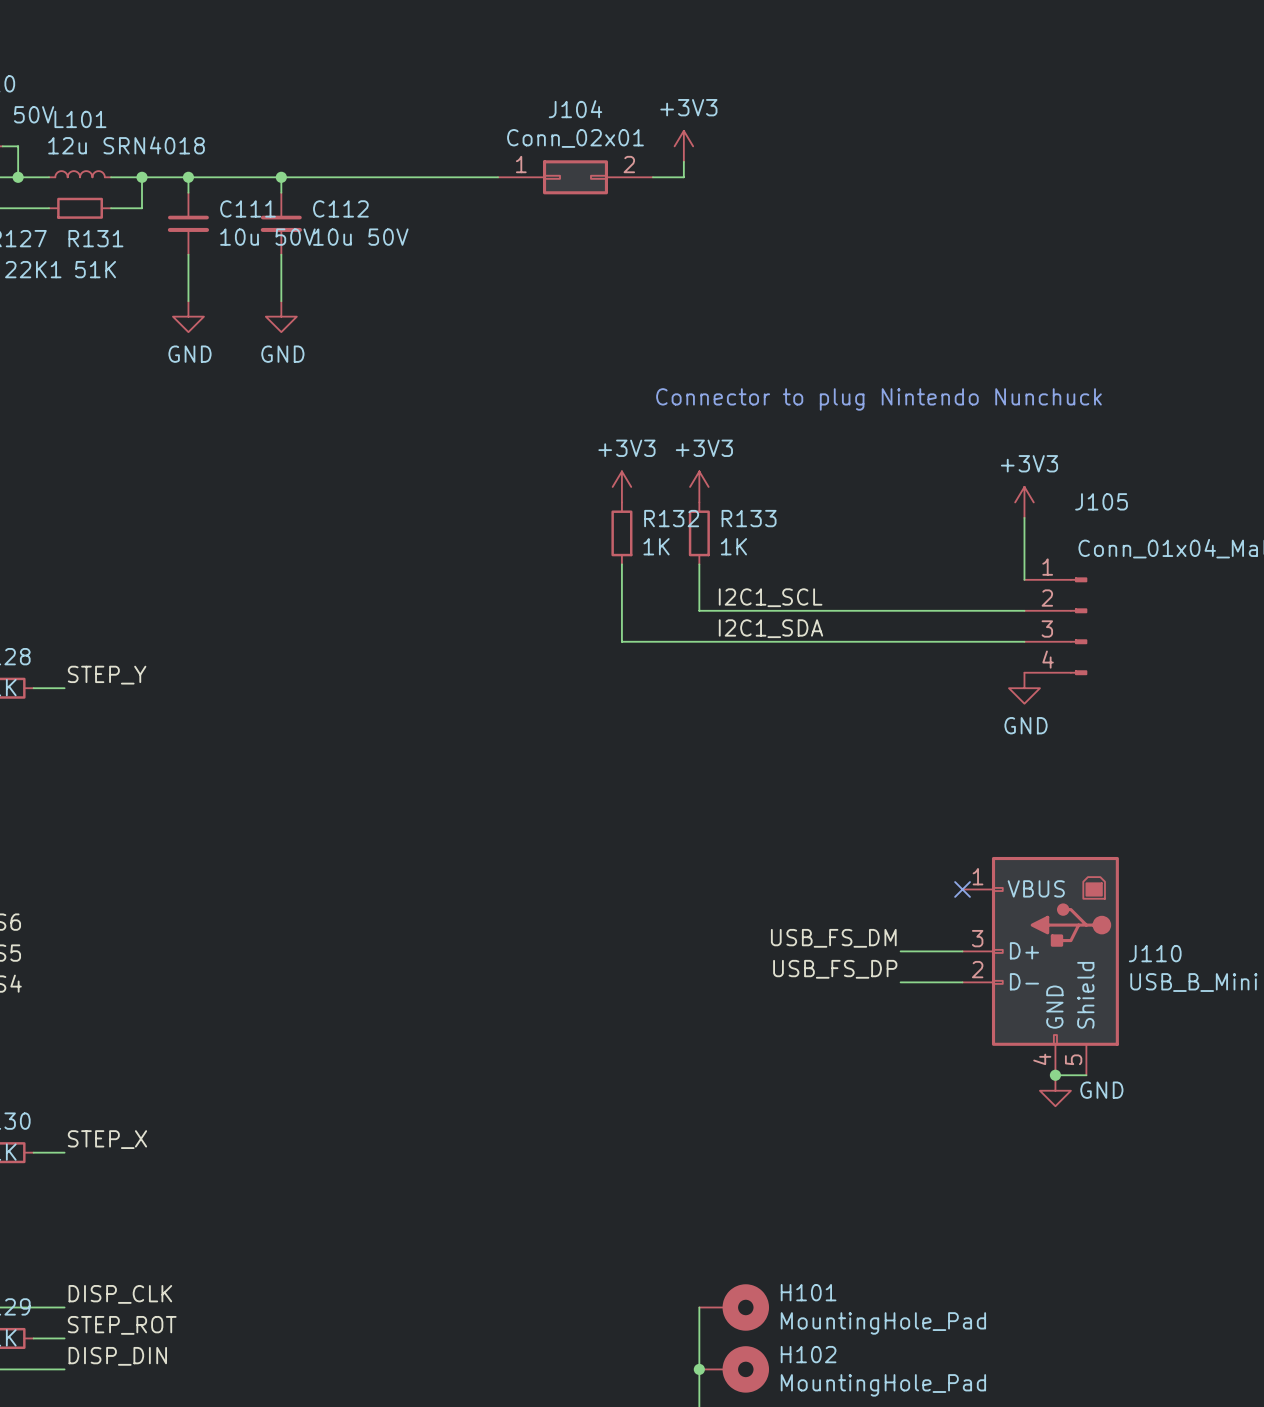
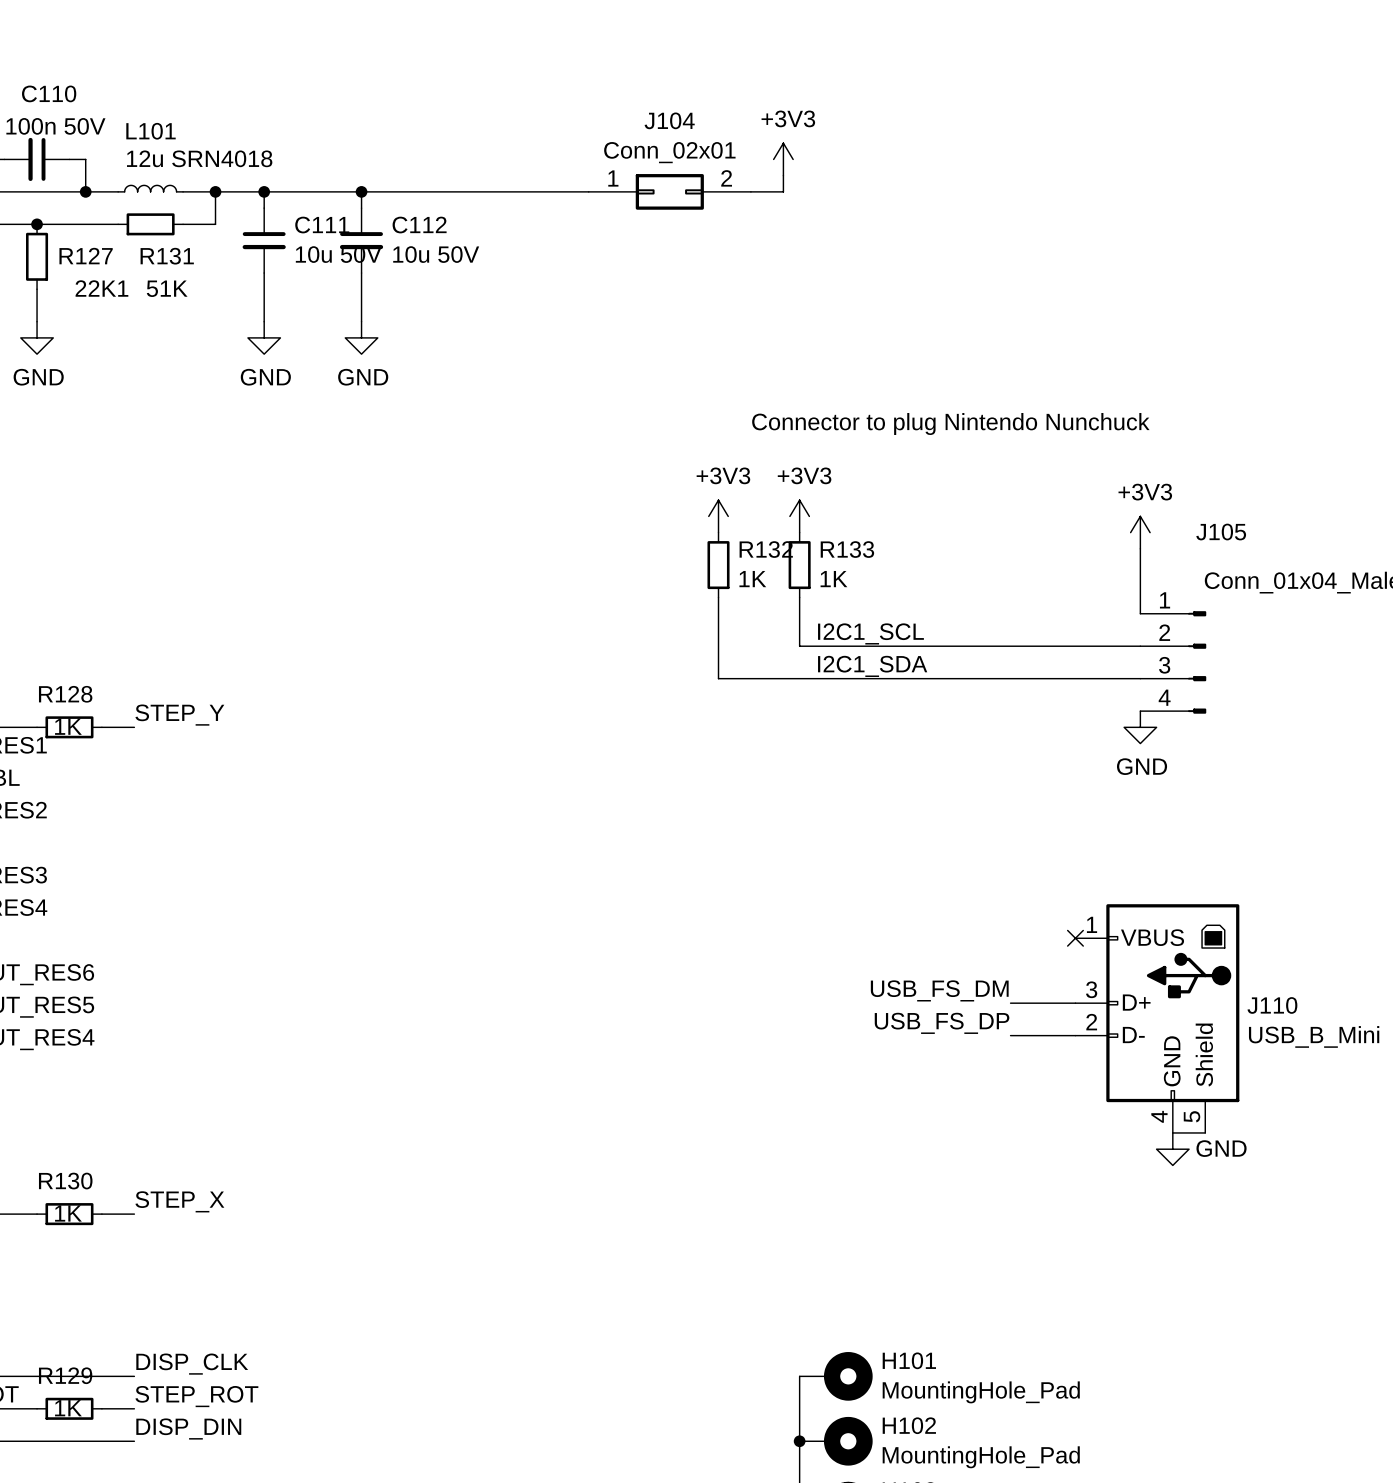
junction: (1055, 1075) -> none

